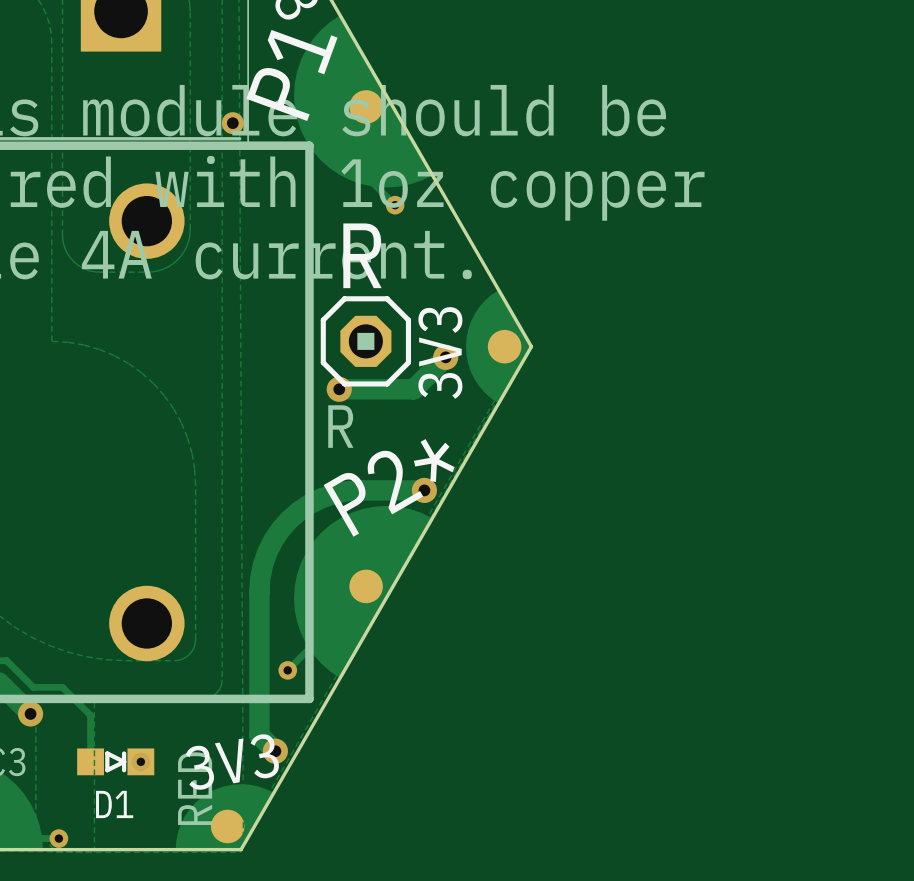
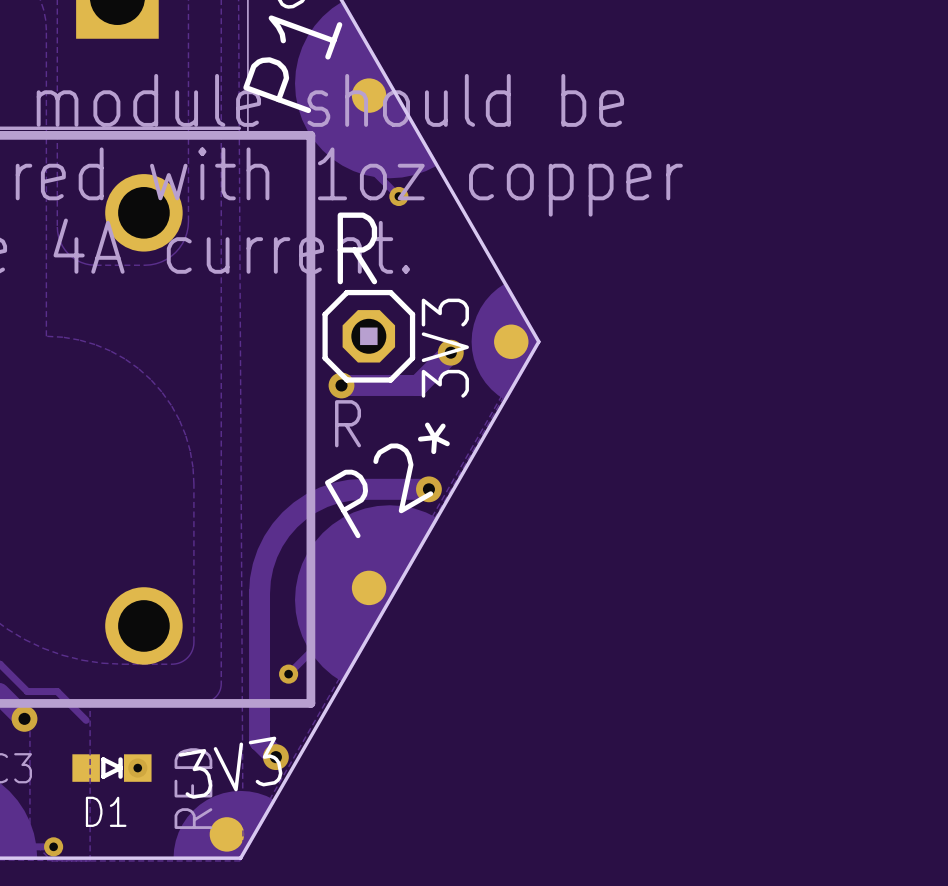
via: (232, 123) -> none
track: (90, 715) (90, 761) -> none

